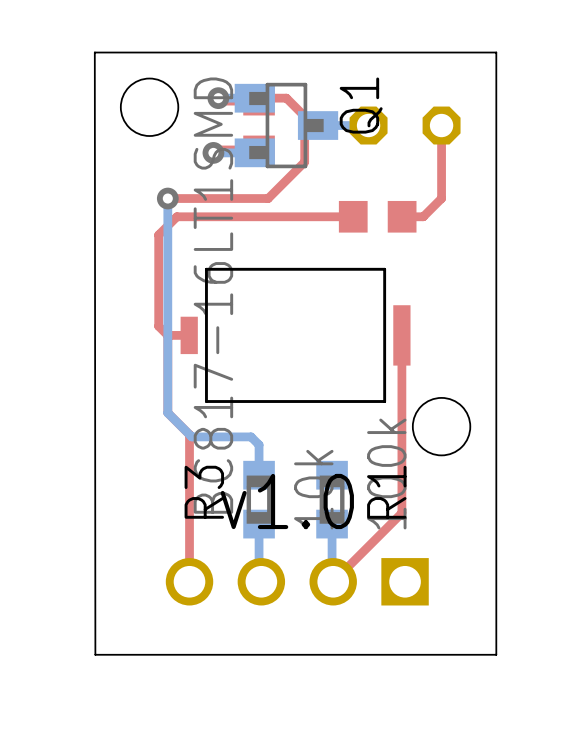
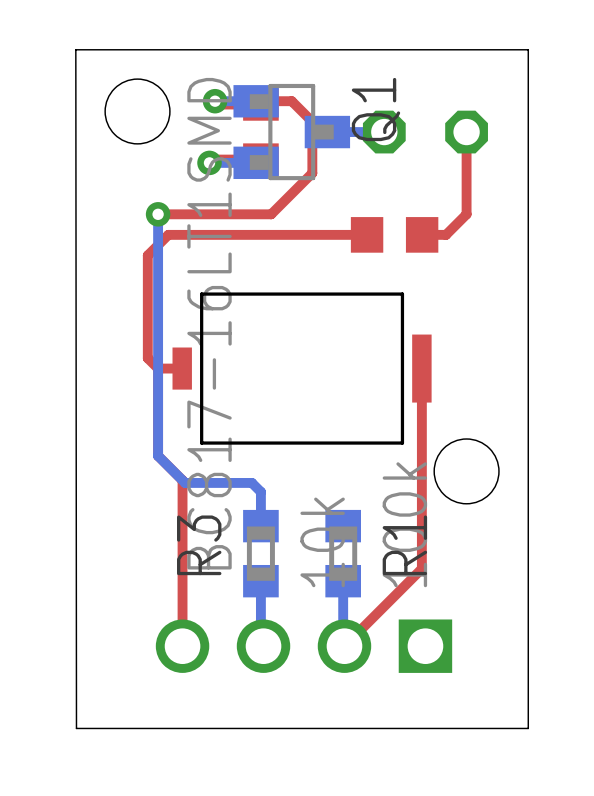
text: v1.0 (287, 501) -> none

